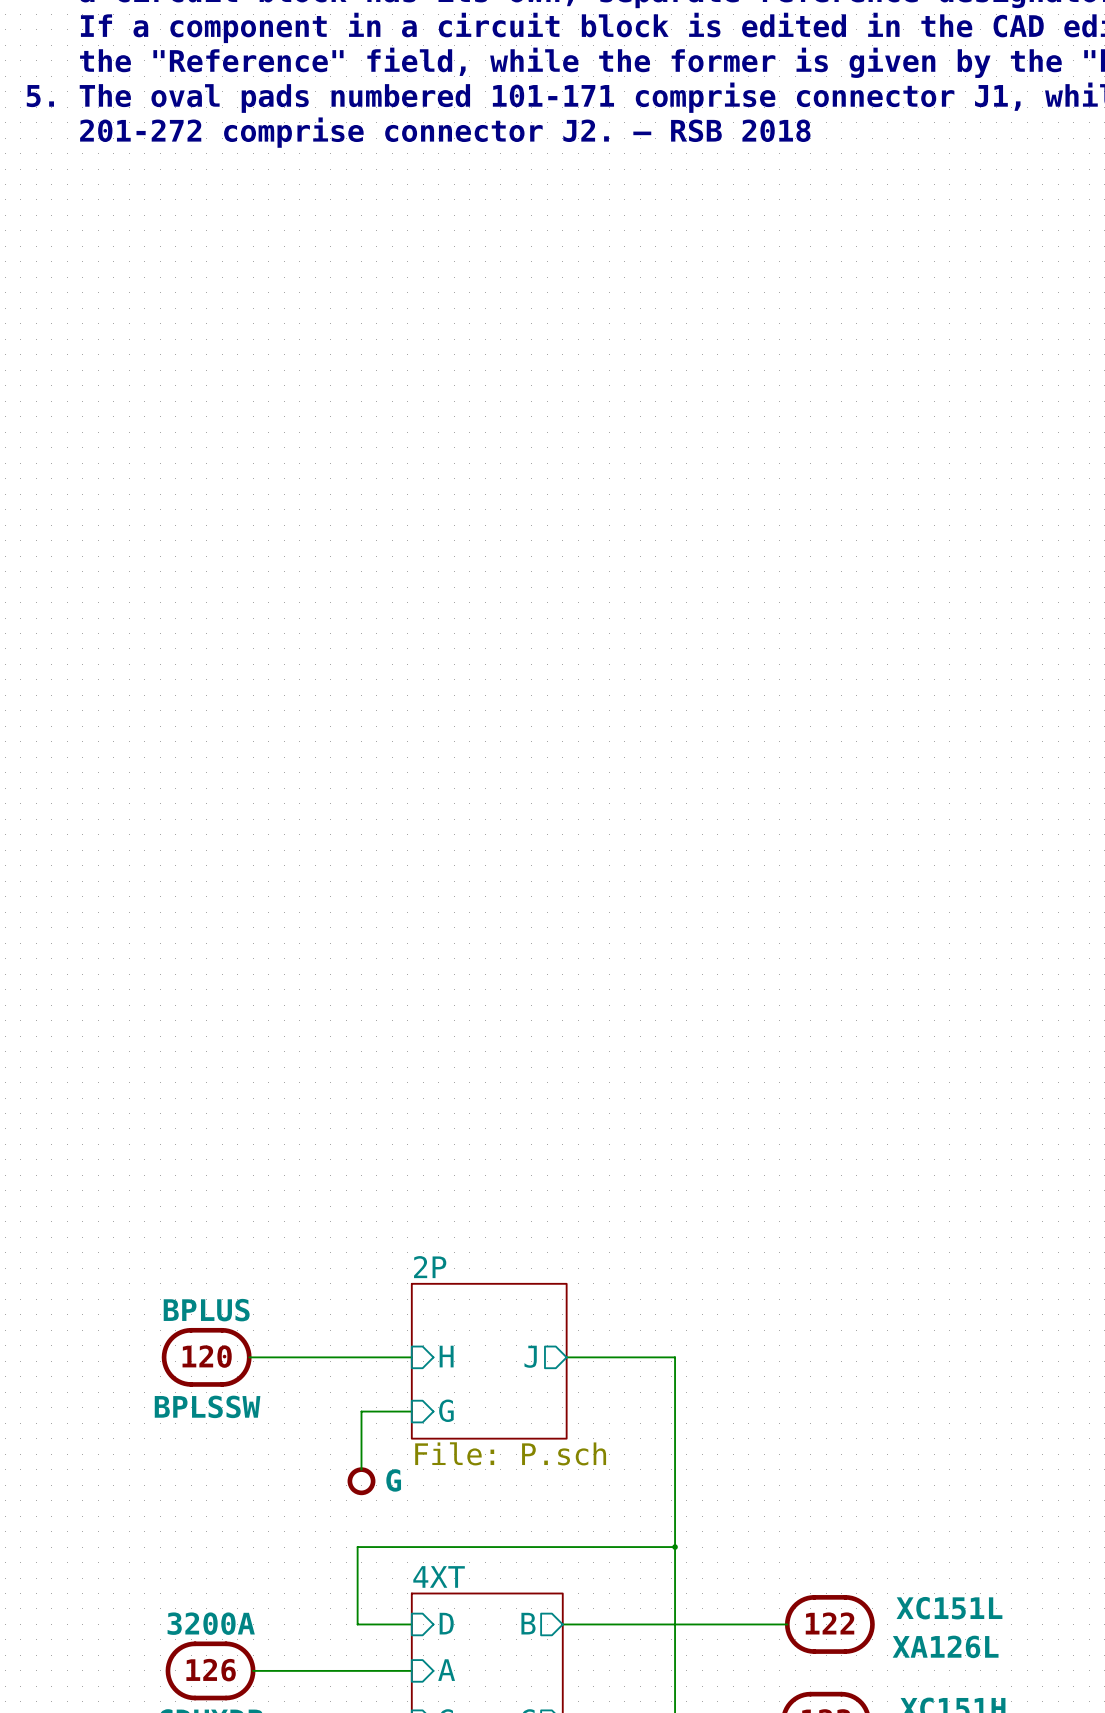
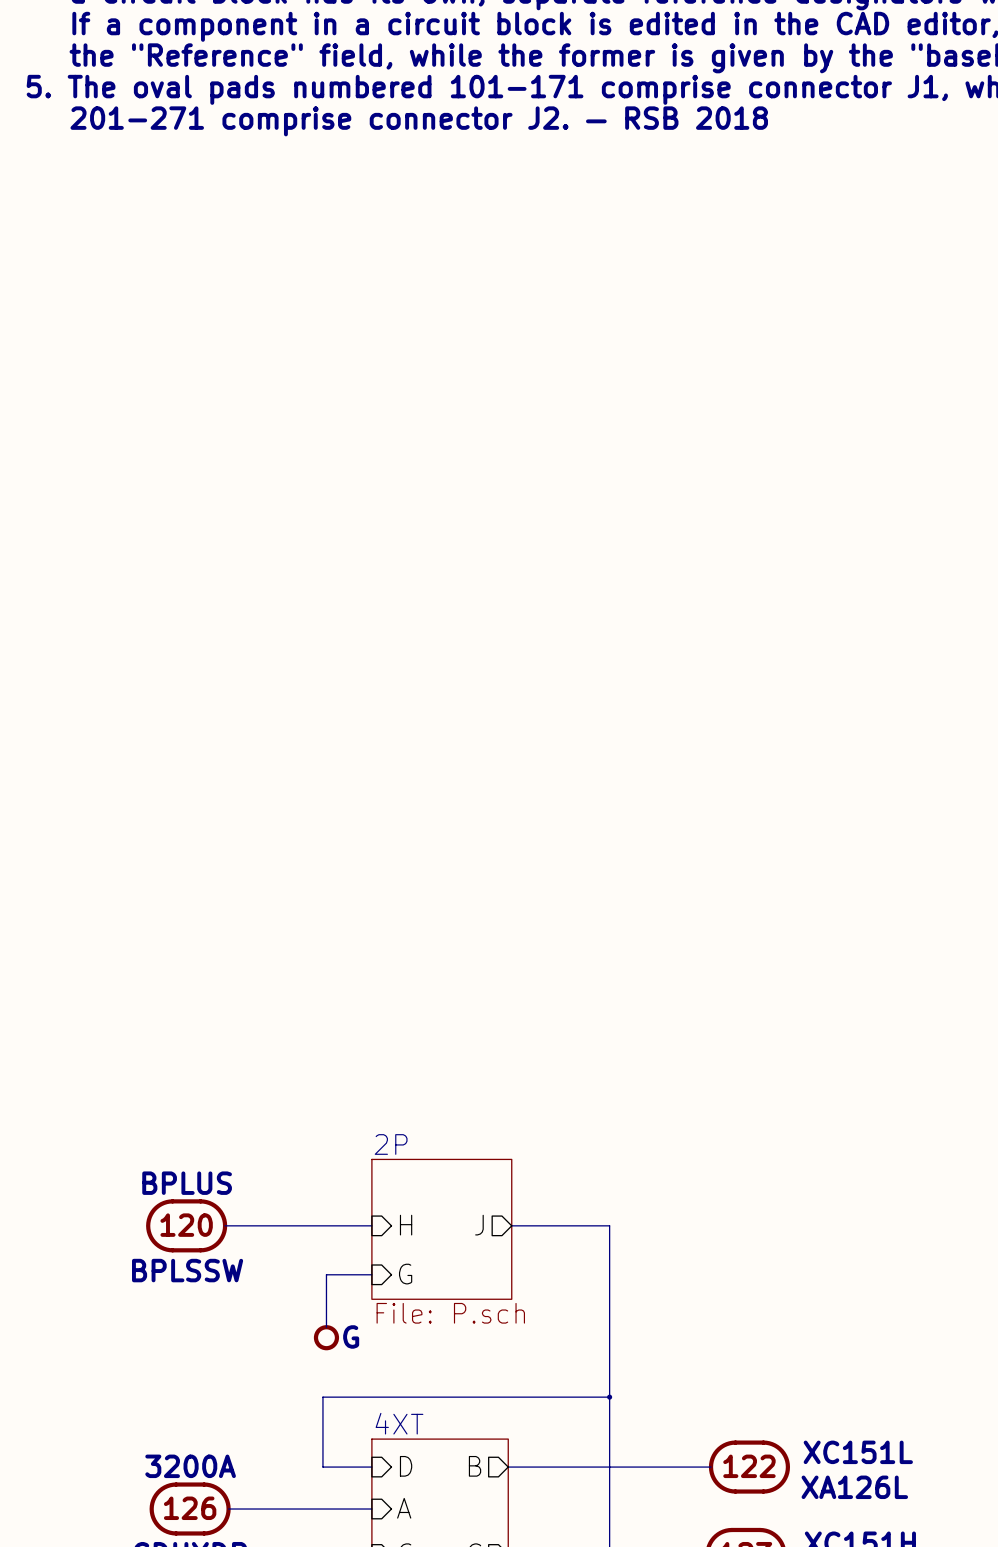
text: 201-272 comprise connector J2. — RSB 2018 (445, 132) -> 201-271 comprise connector J2. — RSB 2018 (419, 121)

